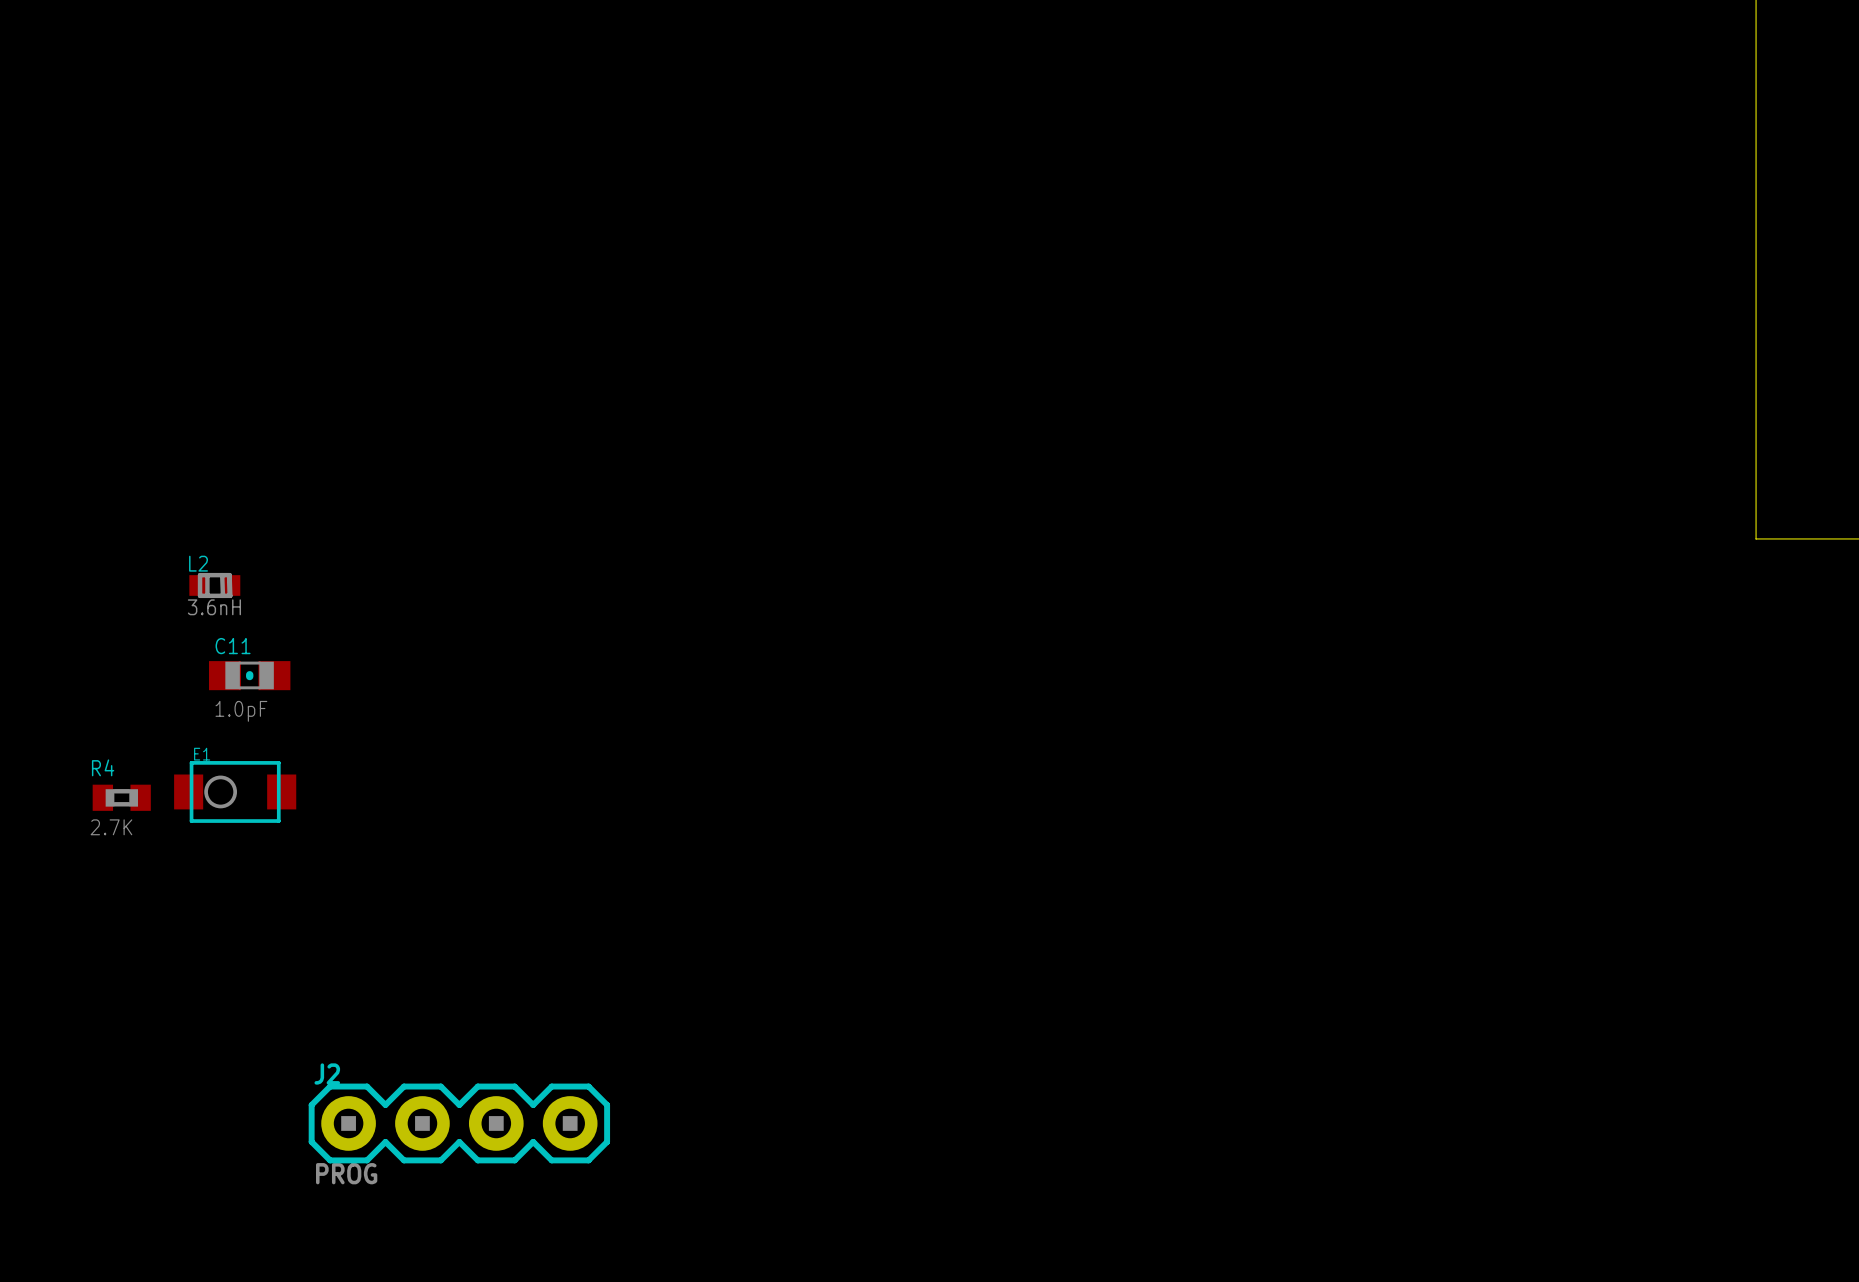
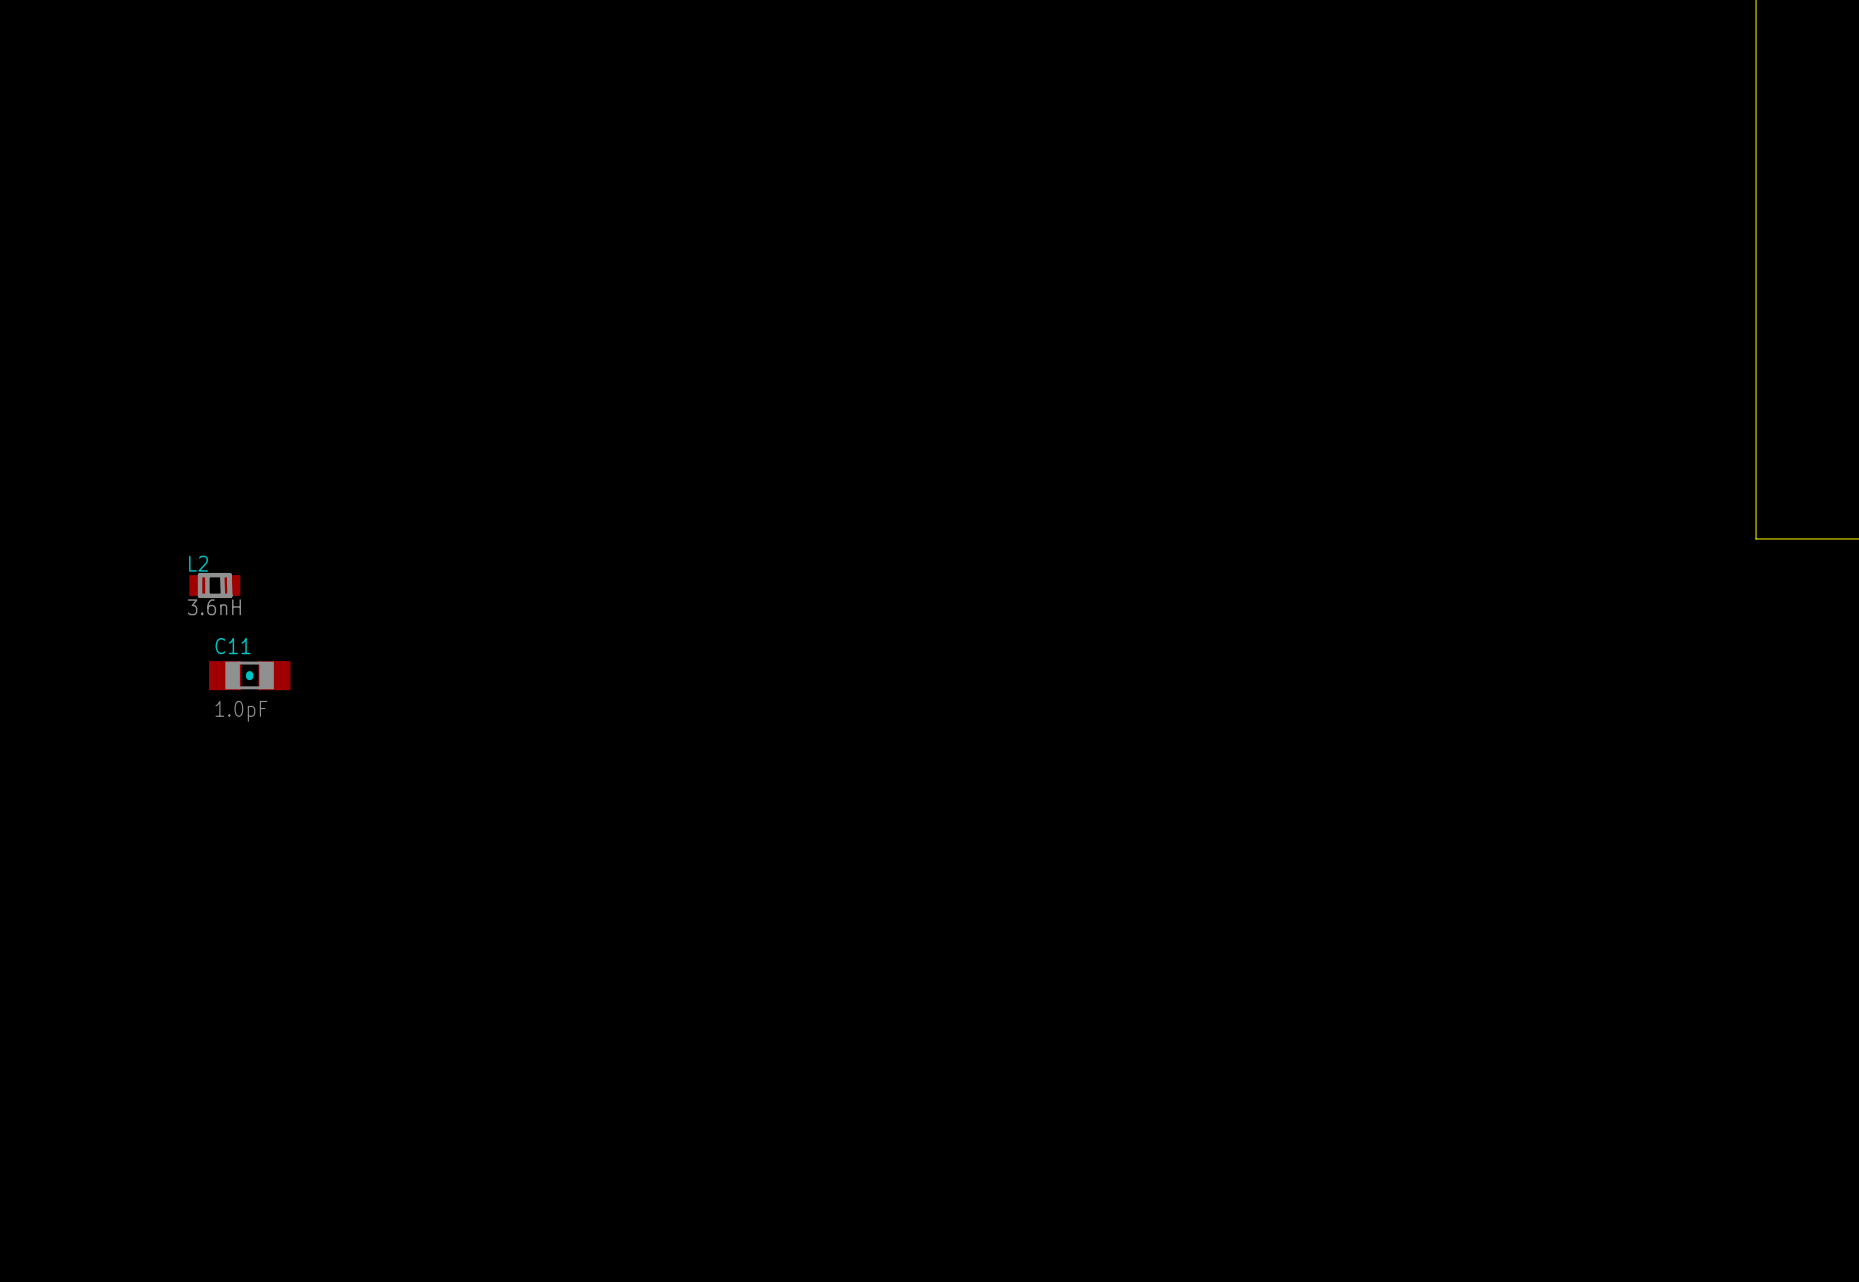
E1: (235, 791) -> none
R4: 2.7K (121, 797) -> none
J2: PROG (459, 1123) -> none

